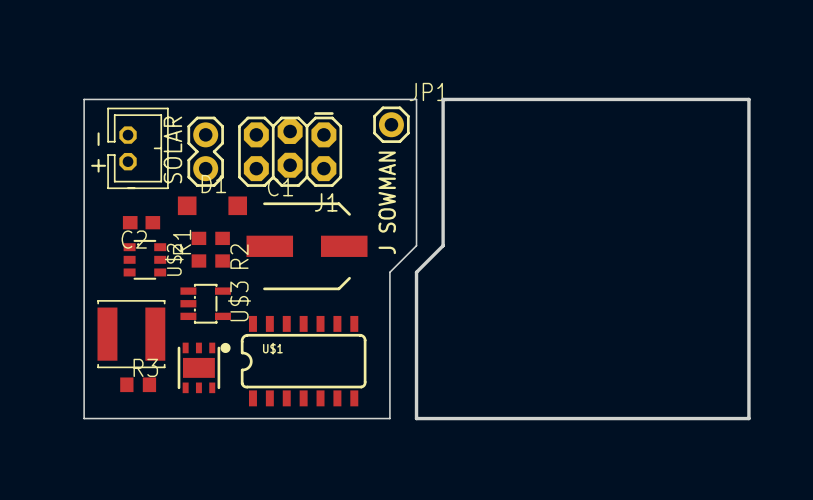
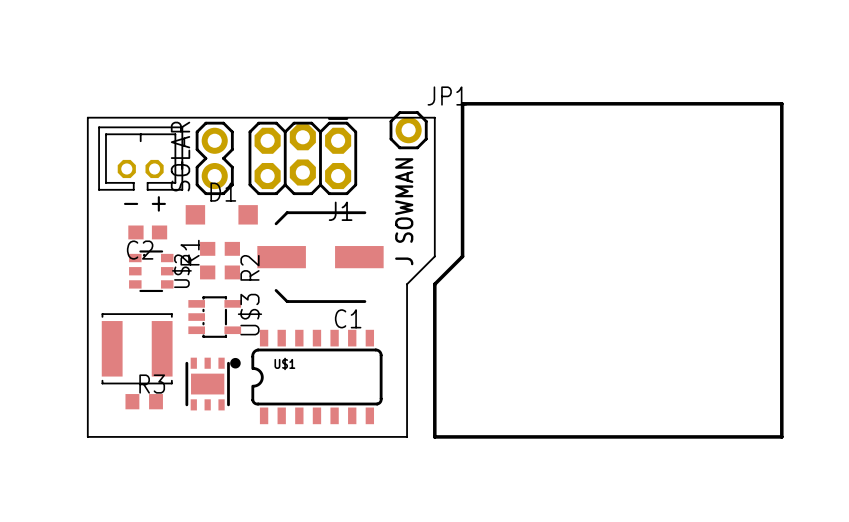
part footprint: [107, 107, 169, 190] -> [98, 126, 184, 191]
board edge: (84, 112) (84, 99) (416, 99) (416, 112) -> (87, 117) (434, 117)
C1 rotation: 0° (307, 246) -> 180° (320, 257)

